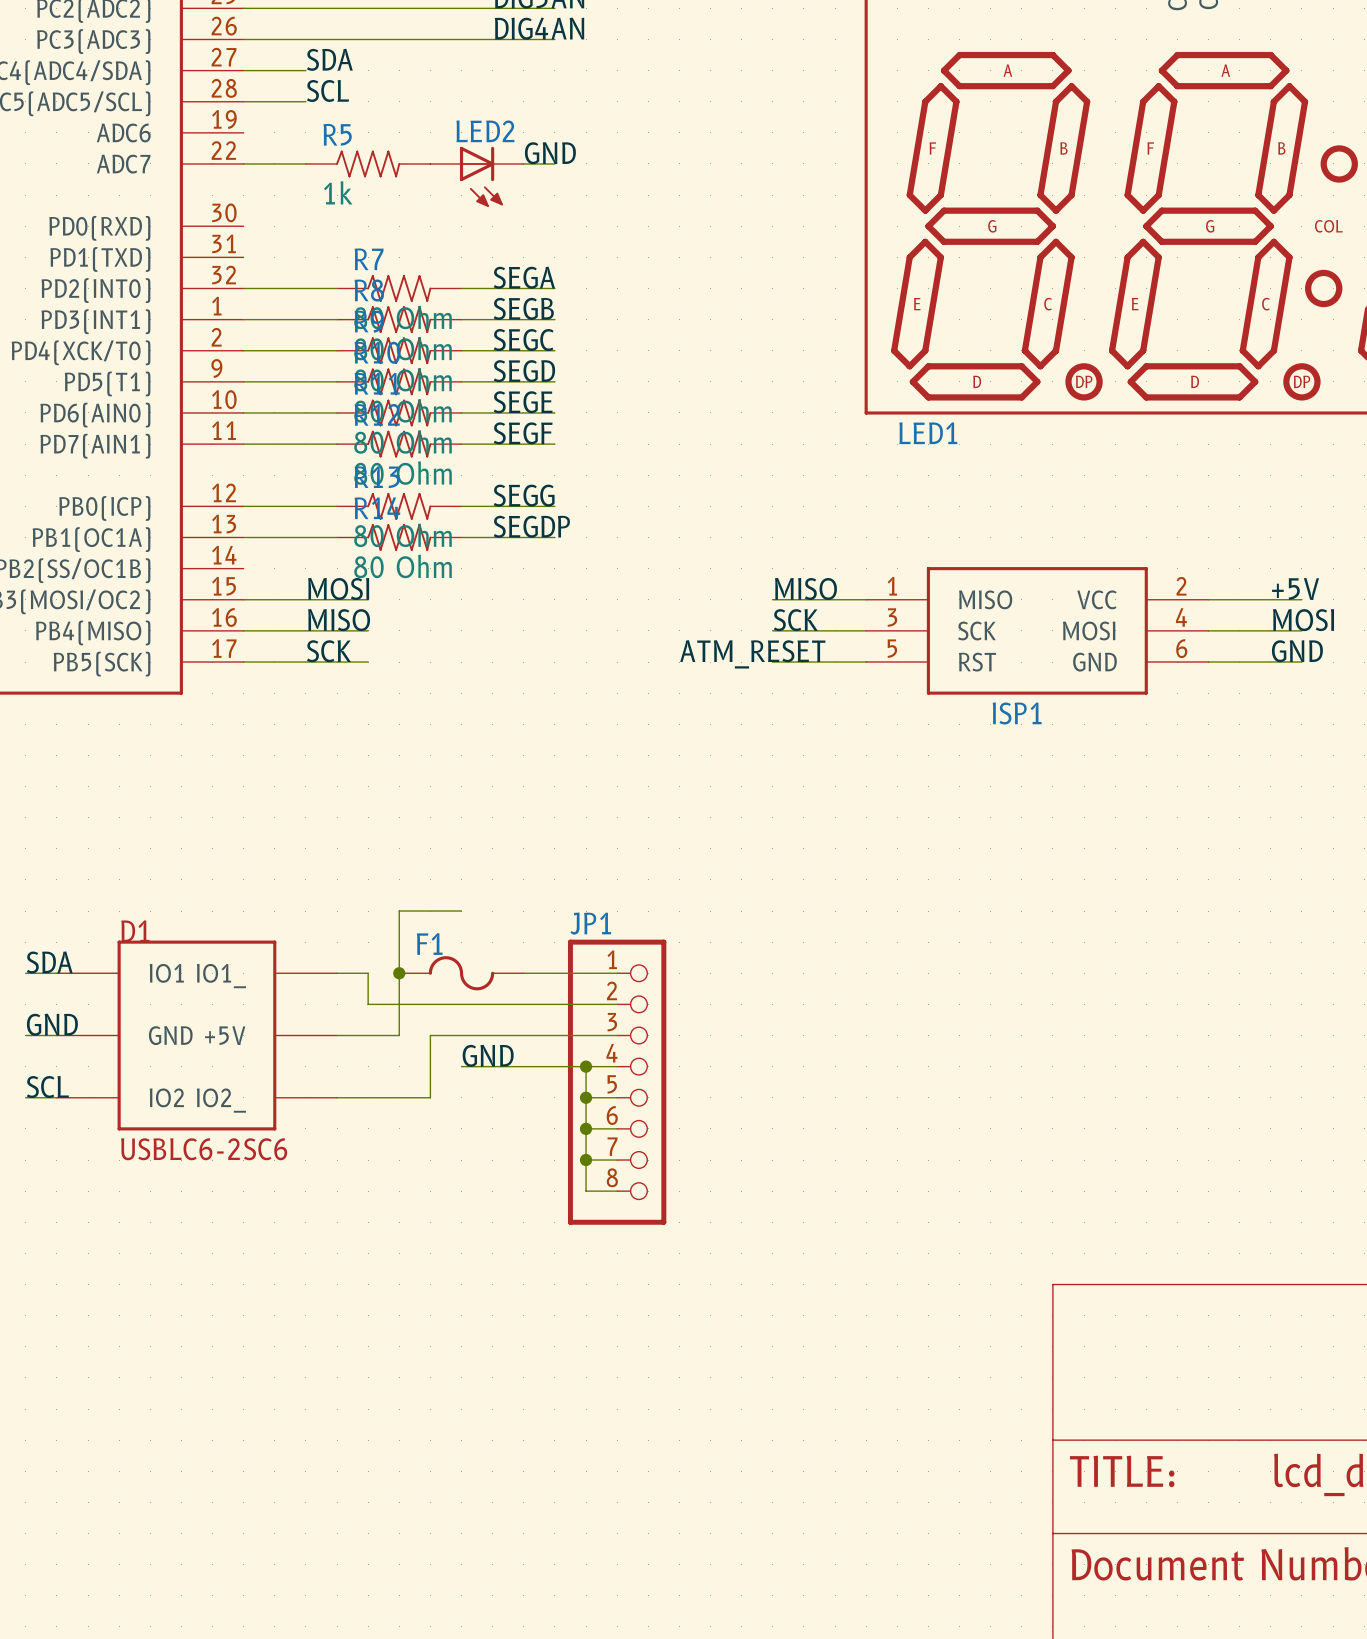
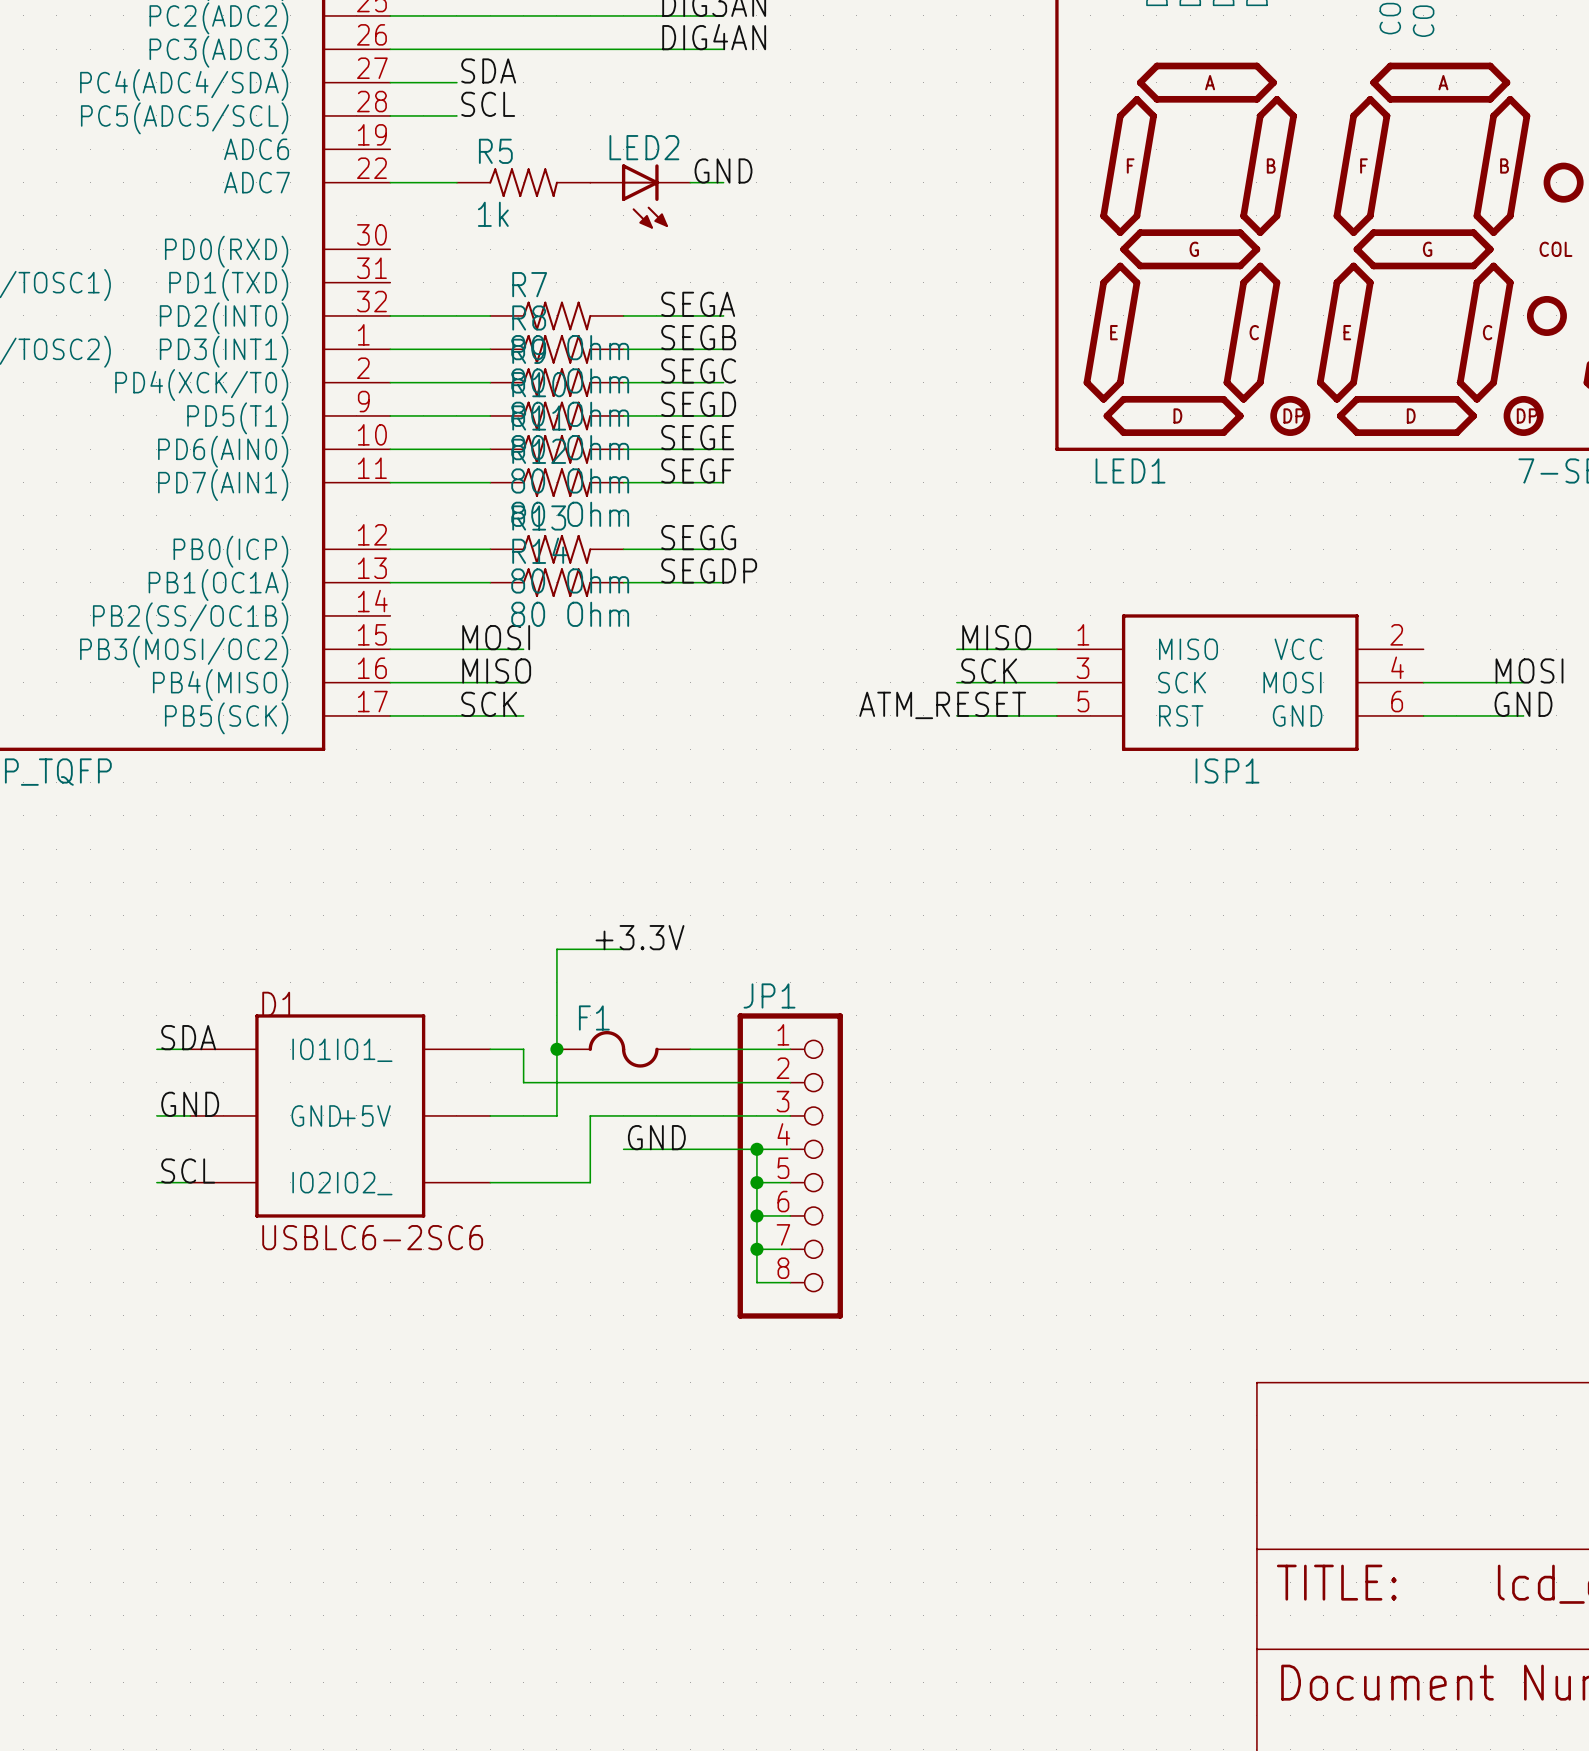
label: +5V (1295, 589) -> none
wire: (1208, 599) (1301, 599) -> none
label: none -> +3.3V (640, 937)
wire: (399, 911) (461, 911) -> (556, 982) (556, 949) (623, 949)

